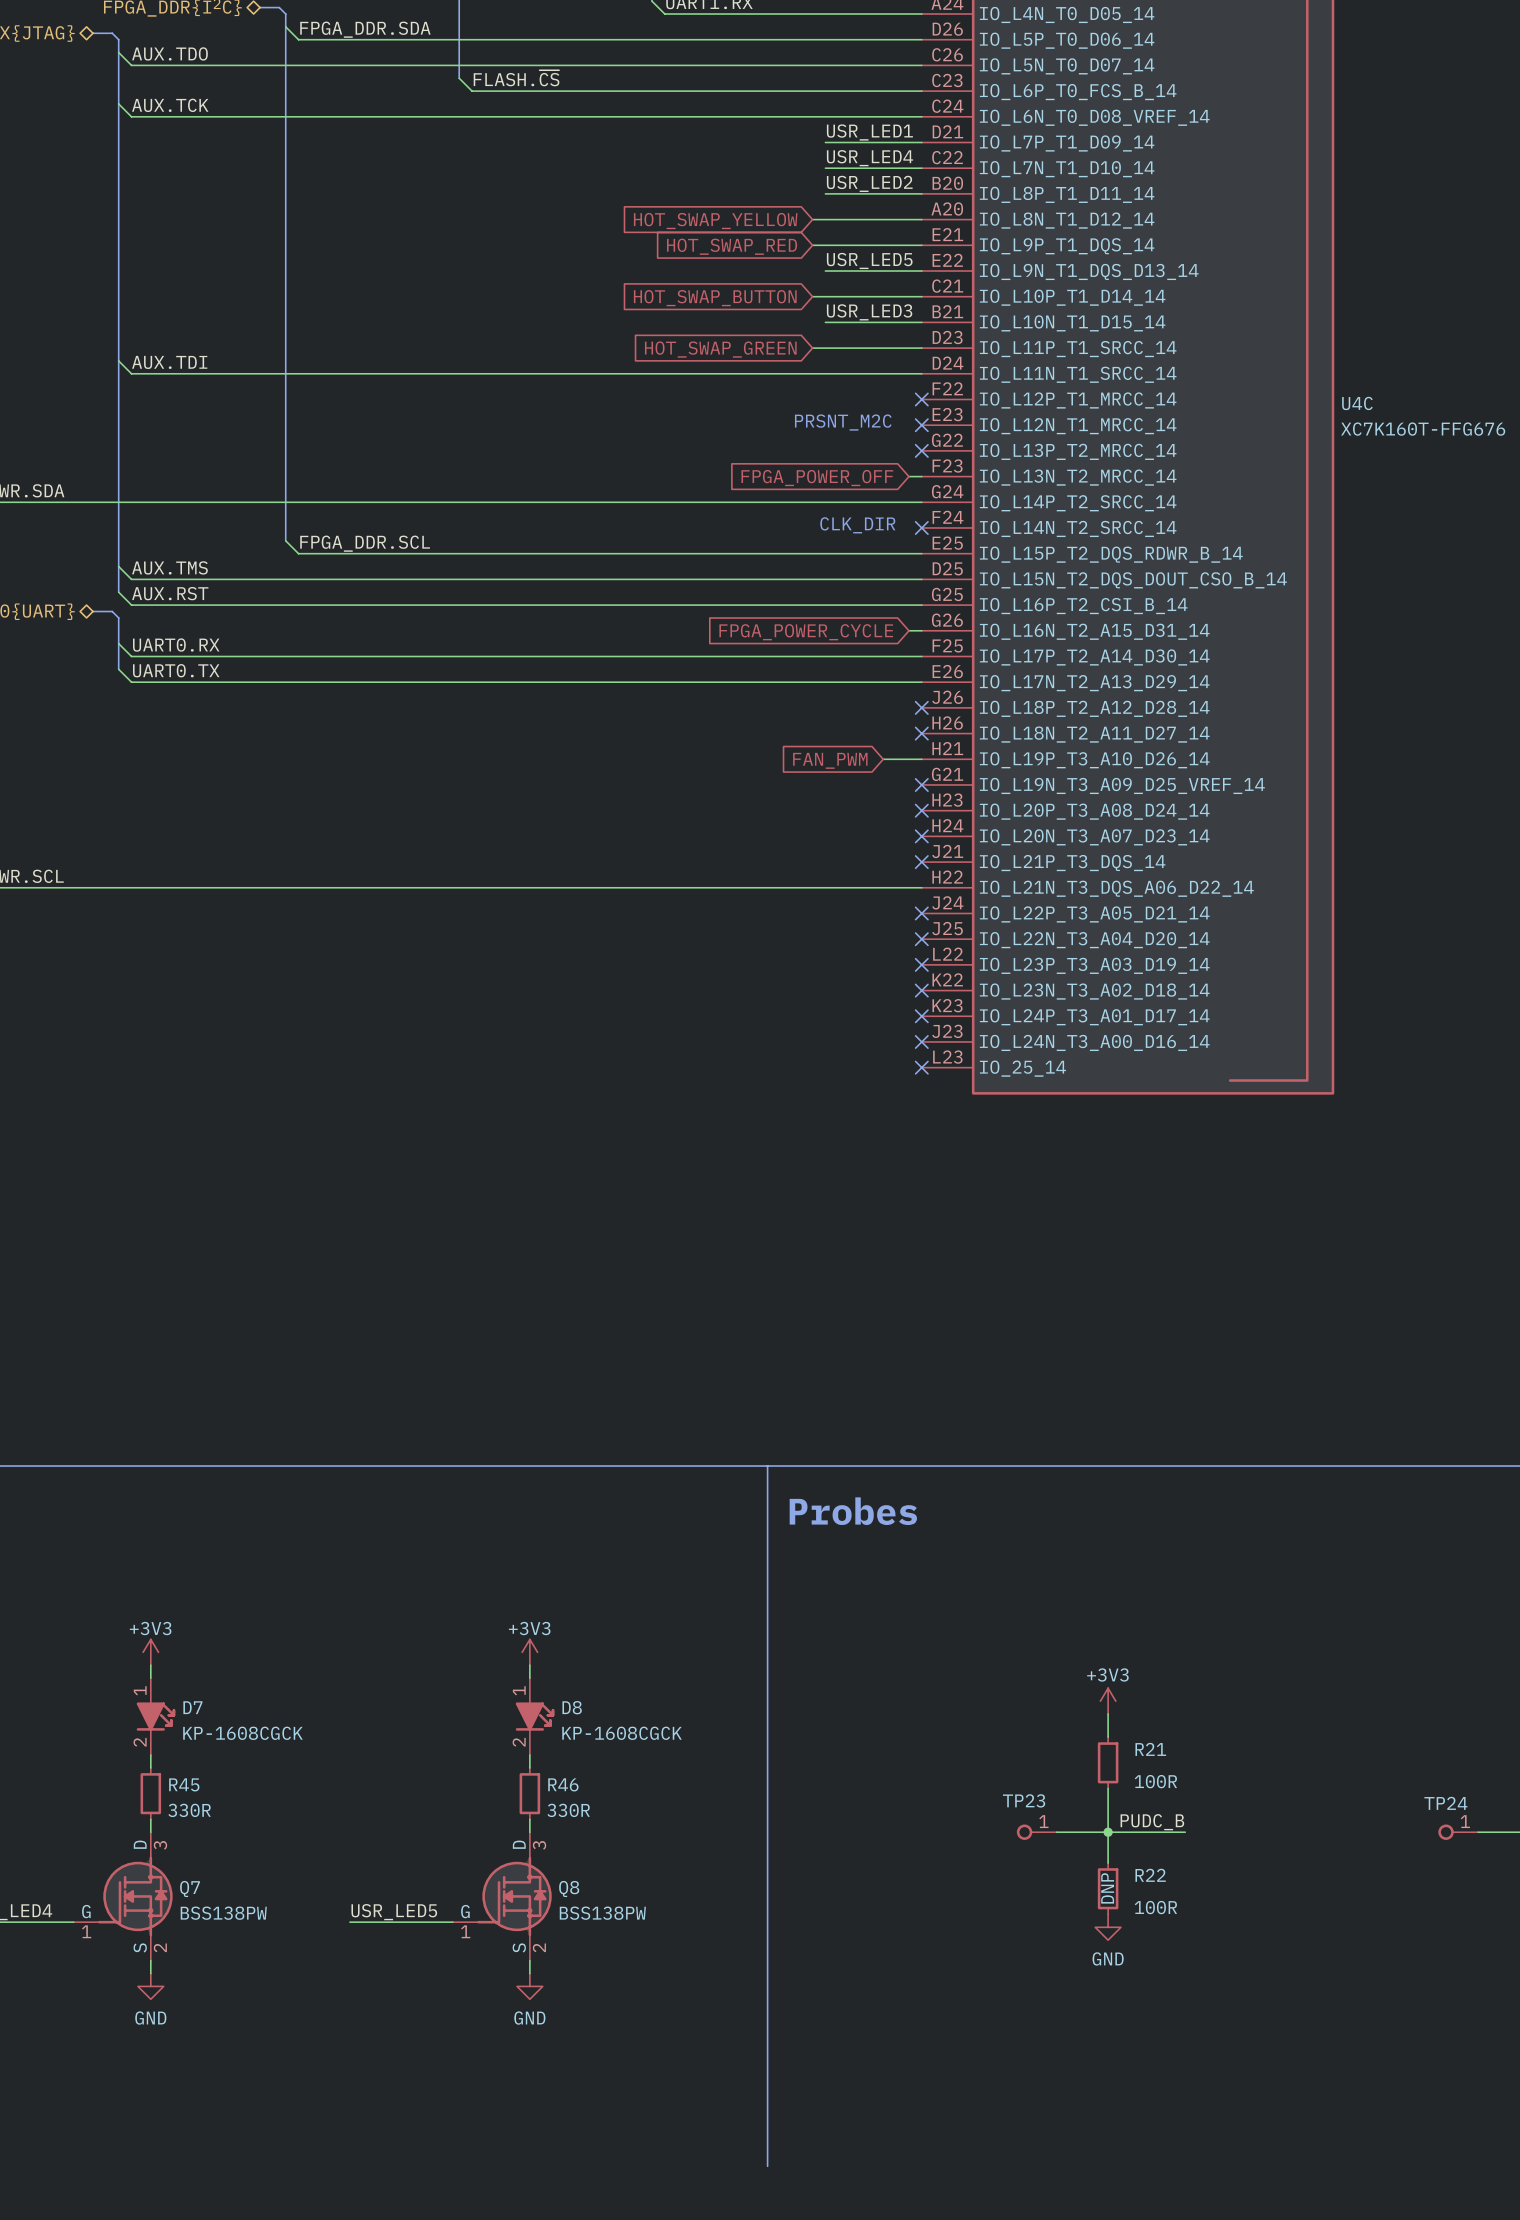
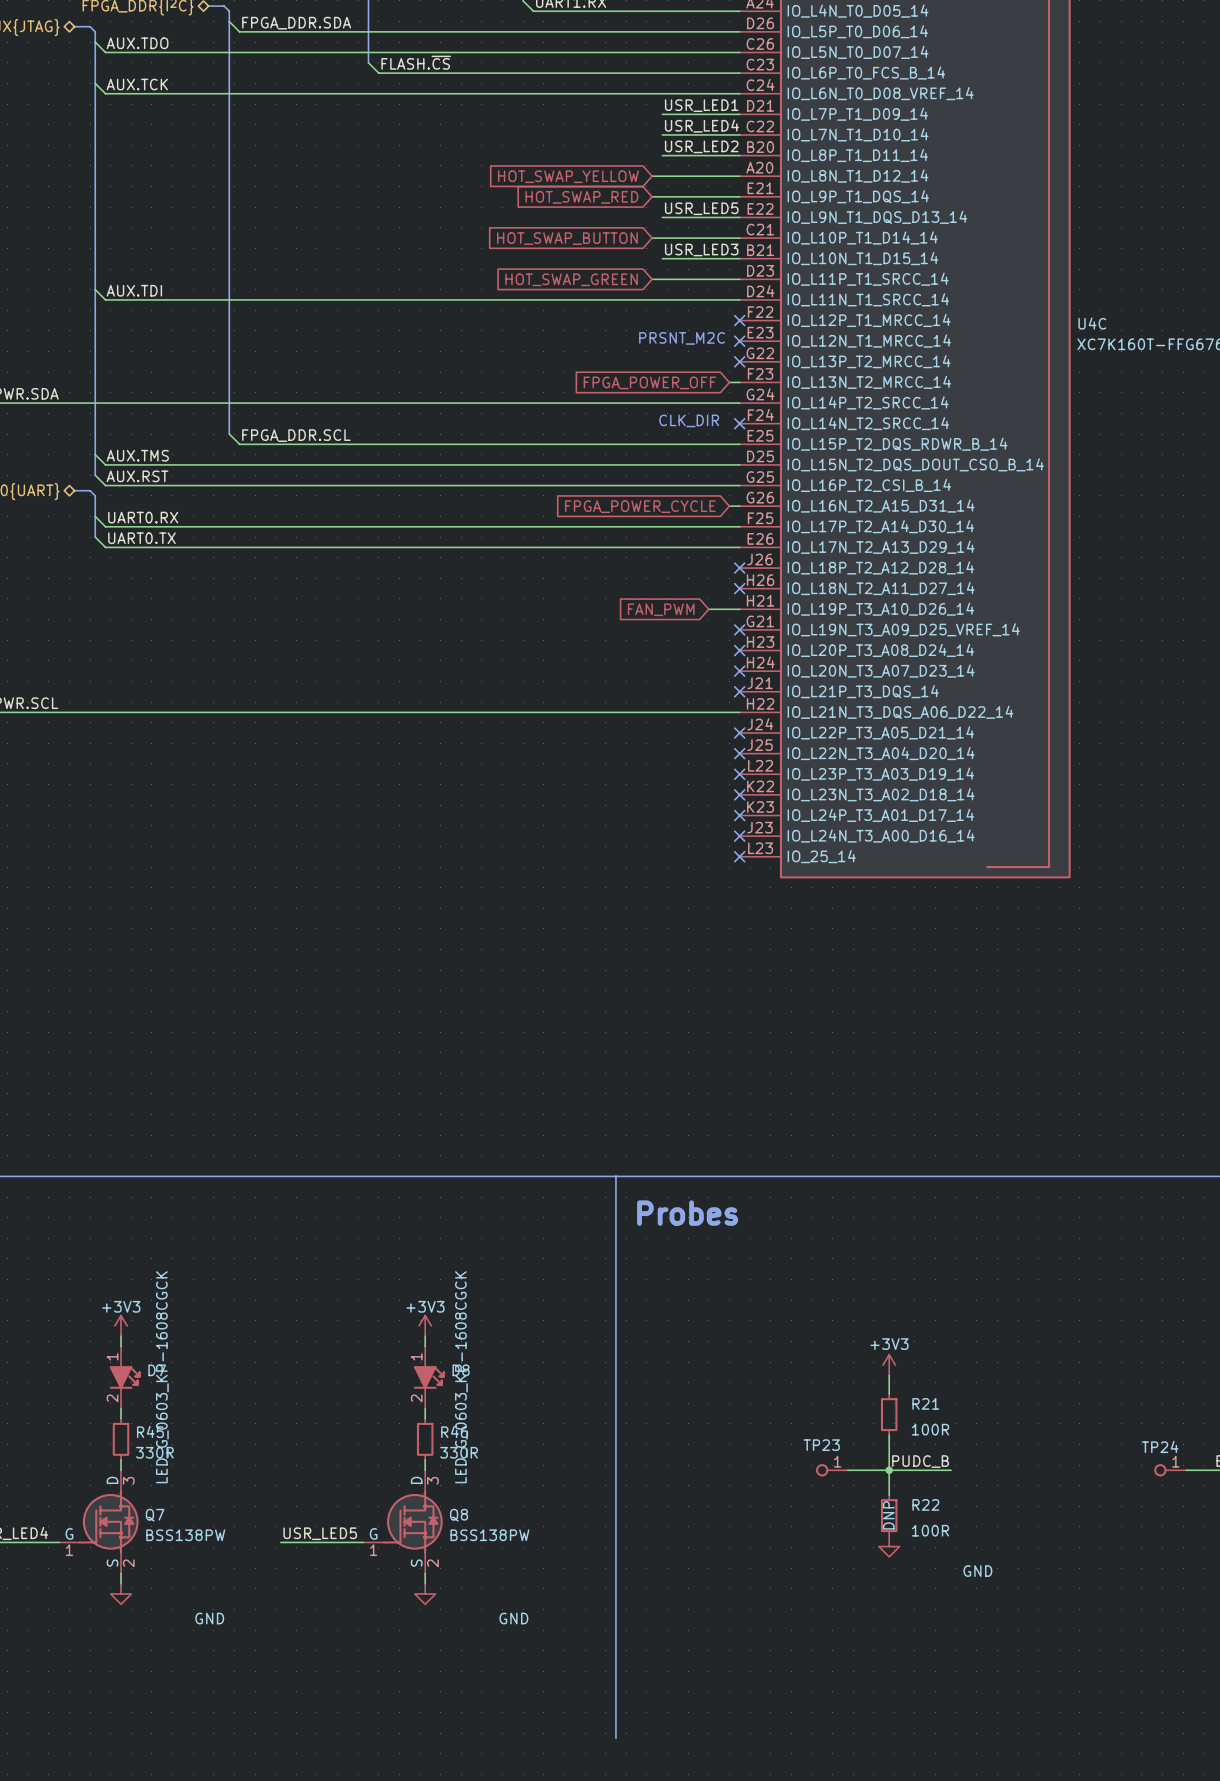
D7 value: none -> LED_G_0603_KP-1608CGCK (162, 1377)
D8 value: none -> LED_G_0603_KP-1608CGCK (461, 1377)
D7 text: KP-1608CGCK (242, 1733) -> none
D8 text: KP-1608CGCK (622, 1733) -> none
power symbol text position: GND (1108, 1958) -> GND (977, 1571)
power symbol text position: GND (150, 2018) -> GND (209, 1618)
power symbol text position: GND (529, 2018) -> GND (513, 1618)

